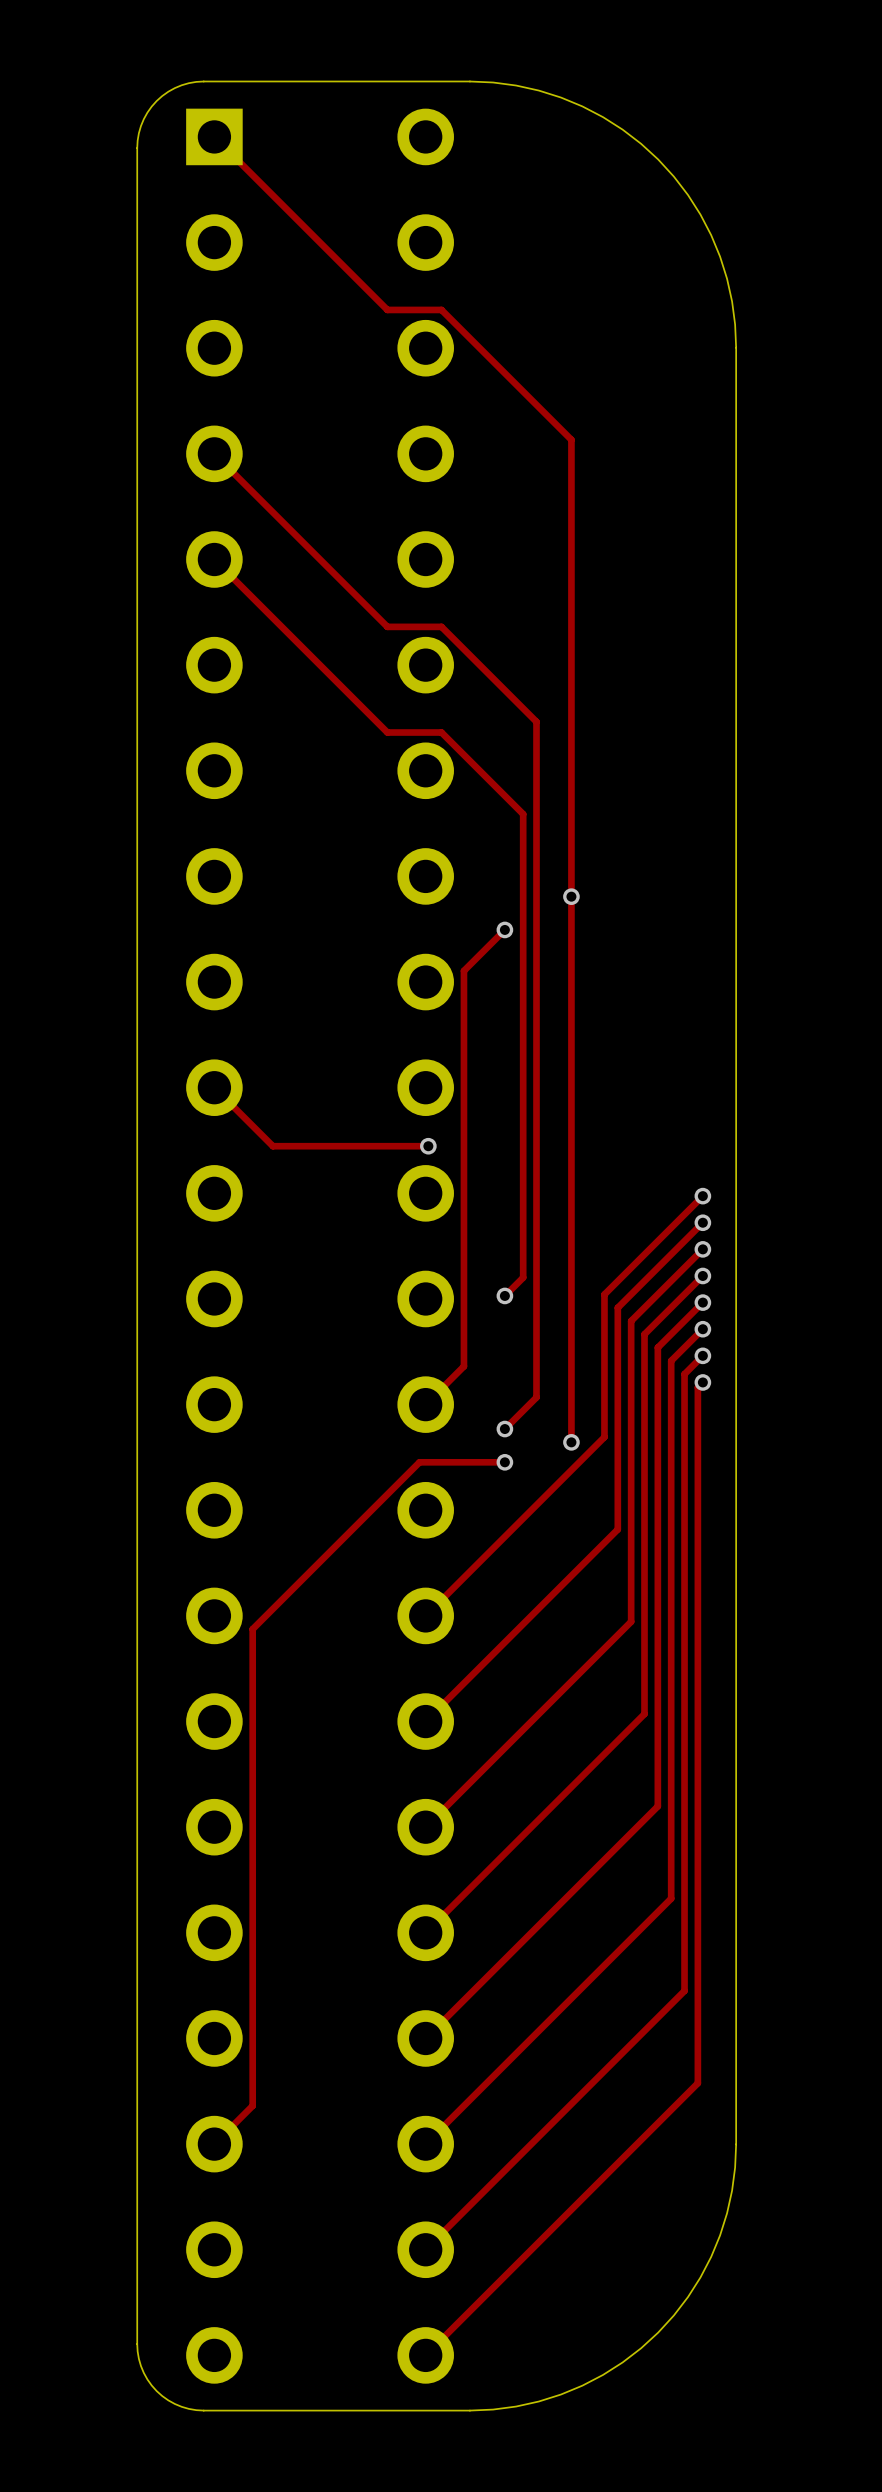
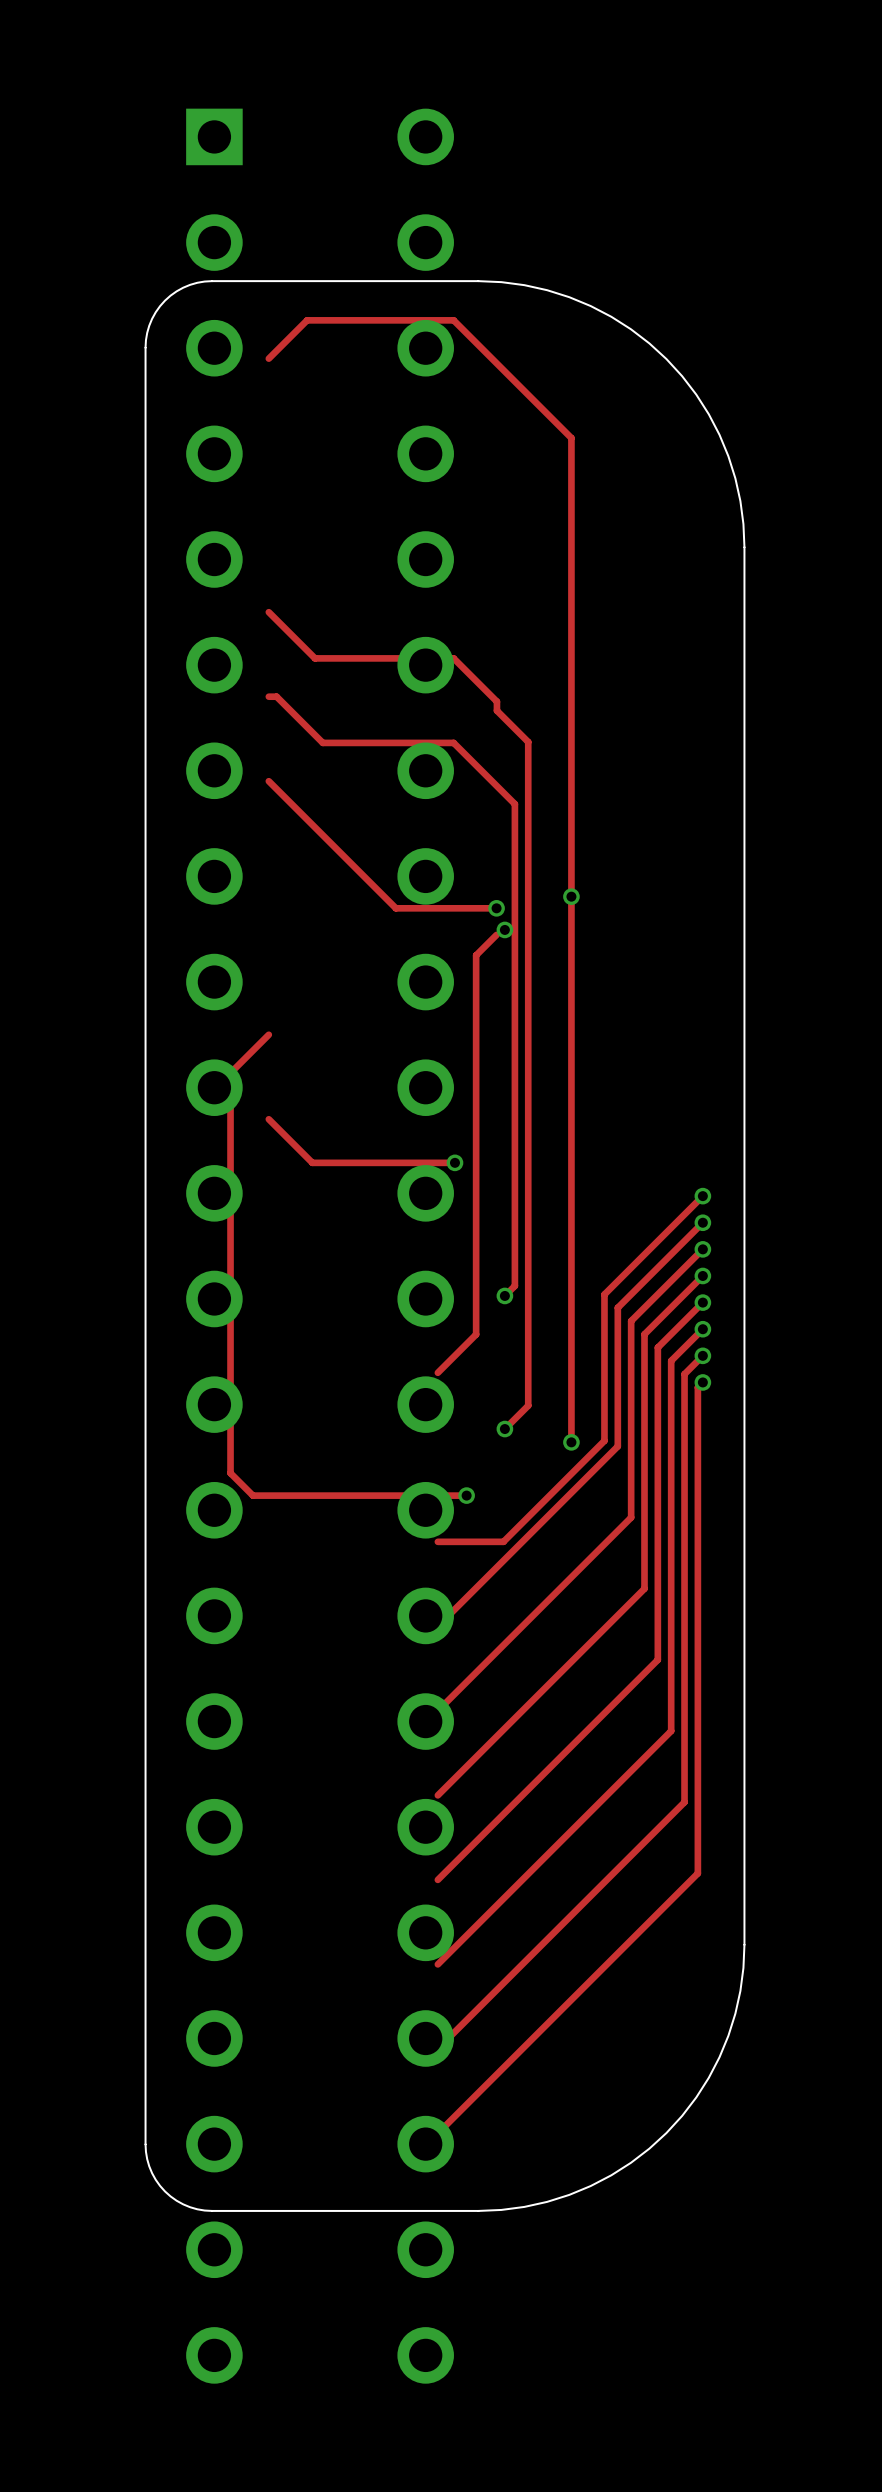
board edge: (203, 81) (493, 82) (538, 90) (582, 106) (603, 117) (641, 143) (673, 176) (687, 194) (711, 235) (720, 256) (727, 278) (735, 324) (735, 2167) (727, 2213) (711, 2256) (687, 2297) (658, 2332) (622, 2362) (582, 2385) (538, 2401) (493, 2409) (196, 2410) (174, 2403) (156, 2391) (143, 2372) (137, 2351) (137, 148) (140, 126) (147, 112) (156, 100) (174, 88) (188, 83) (203, 81) -> (212, 281) (190, 284) (176, 291) (165, 300) (152, 318) (147, 332) (145, 347) (145, 2151) (152, 2173) (165, 2191) (183, 2204) (204, 2210) (478, 2210) (524, 2206) (569, 2194) (611, 2175) (649, 2148) (682, 2115) (708, 2077) (728, 2035) (740, 1990) (743, 1967) (744, 547) (740, 501) (728, 456) (719, 434) (696, 394) (666, 359) (649, 343) (611, 316) (590, 306) (547, 290) (501, 282) (212, 281)
track: (214, 136) (387, 309) (441, 309) (571, 439) -> (268, 358) (307, 320) (453, 320) (571, 439)
track: (214, 453) (387, 626) (441, 626) (536, 721) (536, 1397) (528, 1405) -> (268, 612) (315, 658) (453, 658) (496, 701) (496, 710) (528, 742) (528, 1405)
track: (214, 559) (387, 732) (441, 732) (523, 814) (523, 1277) (514, 1285) -> (268, 696) (276, 696) (322, 742) (453, 742) (514, 804) (514, 1285)
track: none -> (268, 781) (395, 908) (496, 908)
via: none -> (496, 908)
track: (504, 929) (463, 970) (463, 1366) (425, 1404) -> none
track: none -> (496, 934) (476, 955) (476, 1334) (437, 1372)
track: none -> (268, 1034) (230, 1073) (230, 1473) (252, 1495) (466, 1495)
track: (214, 1087) (272, 1146) (428, 1146) -> none
track: none -> (268, 1119) (312, 1162) (454, 1162)
via position: (428, 1146) -> (454, 1162)
track: (604, 1437) (425, 1615) -> (604, 1437) (604, 1440) (503, 1541) (437, 1541)
track: (617, 1446) (617, 1529) (425, 1721) -> (617, 1446) (437, 1626)
track: (504, 1462) (419, 1462) (252, 1629) (252, 2105) (214, 2144) -> none
via position: (504, 1462) -> (466, 1495)
track: (631, 1517) (631, 1621) (425, 1827) -> (631, 1517) (437, 1710)
track: (644, 1588) (644, 1714) (425, 1932) -> (644, 1588) (437, 1795)
track: (657, 1659) (657, 1806) (425, 2038) -> (657, 1659) (437, 1879)
track: (671, 1731) (671, 1898) (425, 2144) -> (671, 1731) (437, 1964)
track: (684, 1802) (684, 1990) (425, 2249) -> (684, 1802) (437, 2048)
track: (697, 1873) (697, 2083) (425, 2355) -> (697, 1873) (437, 2133)

